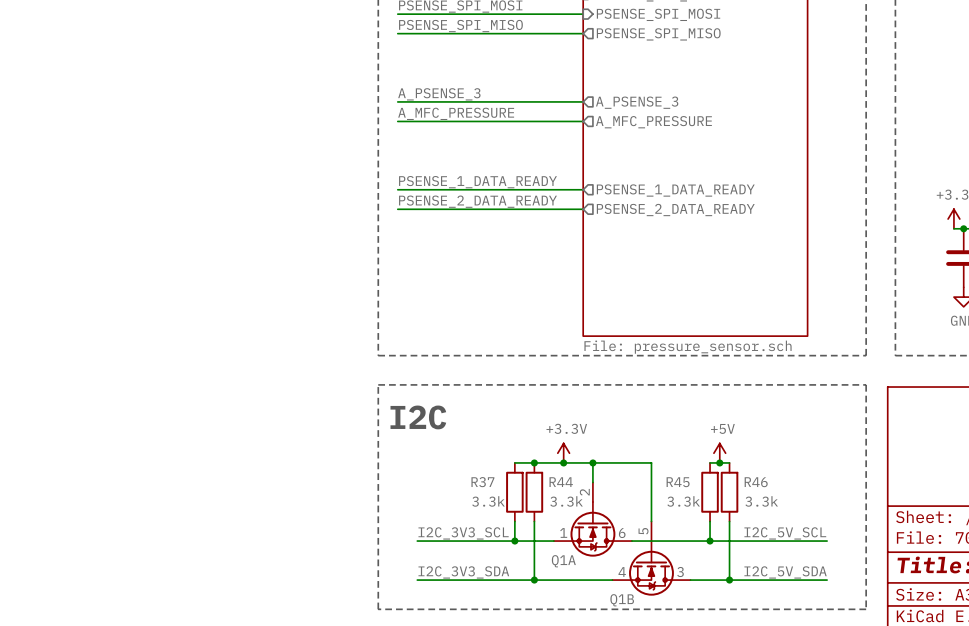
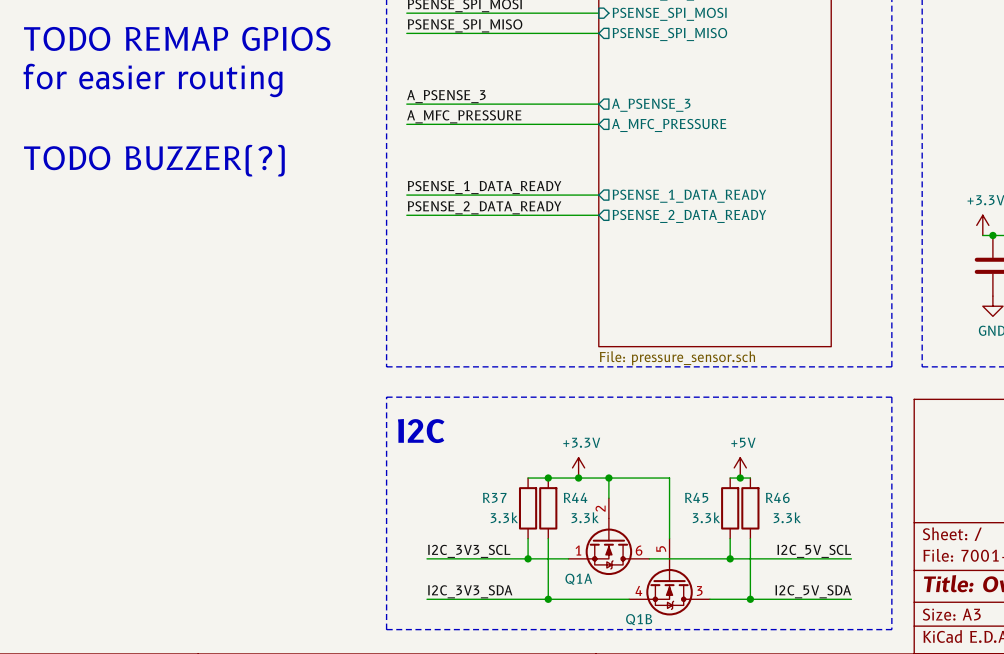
text: none -> TODO REMAP GPIOS (177, 38)
text: none -> for easier routing (153, 80)
text: none -> TODO BUZZER(?) (154, 160)

